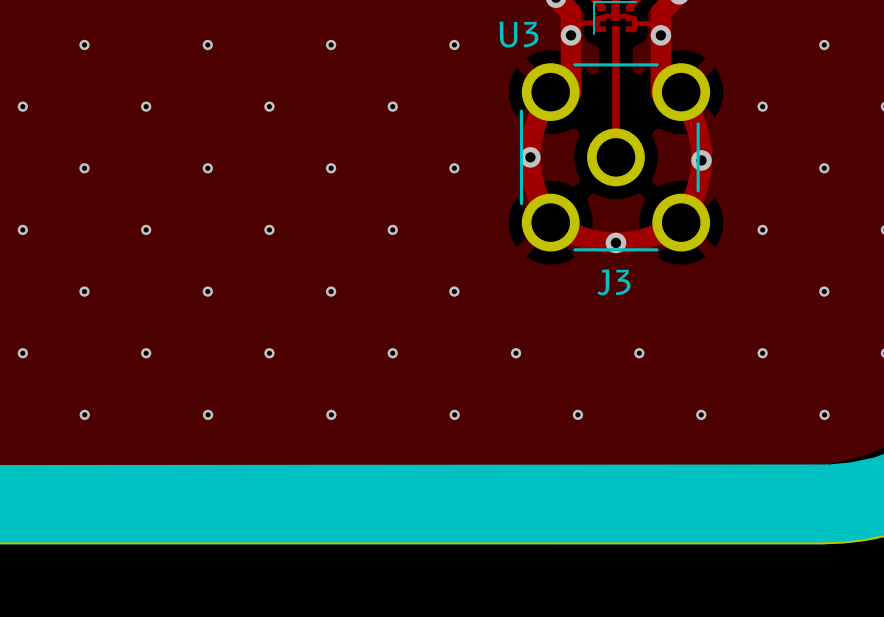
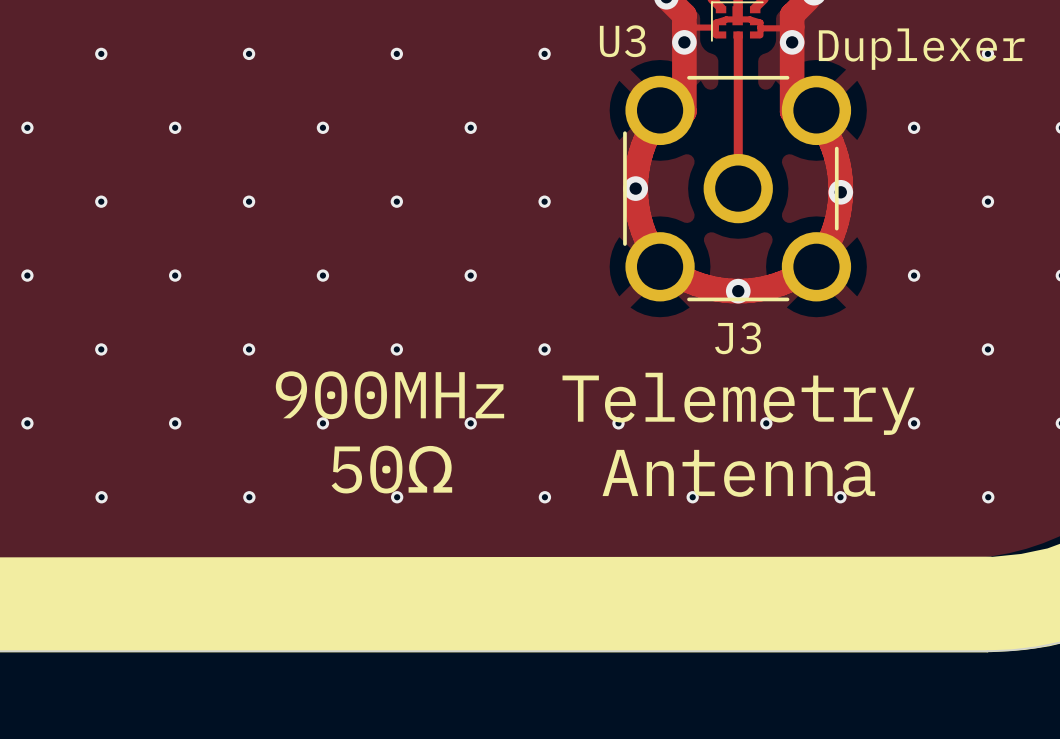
text: none -> Duplexer (921, 49)
text: none -> 900MHz (389, 395)
text: none -> Telemetry (738, 403)
text: none -> 50Ω (391, 469)
text: none -> Antenna (738, 473)

